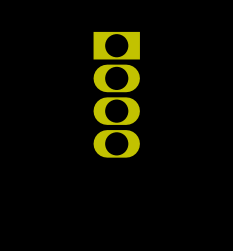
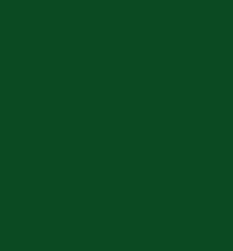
part: (116, 94) -> none

